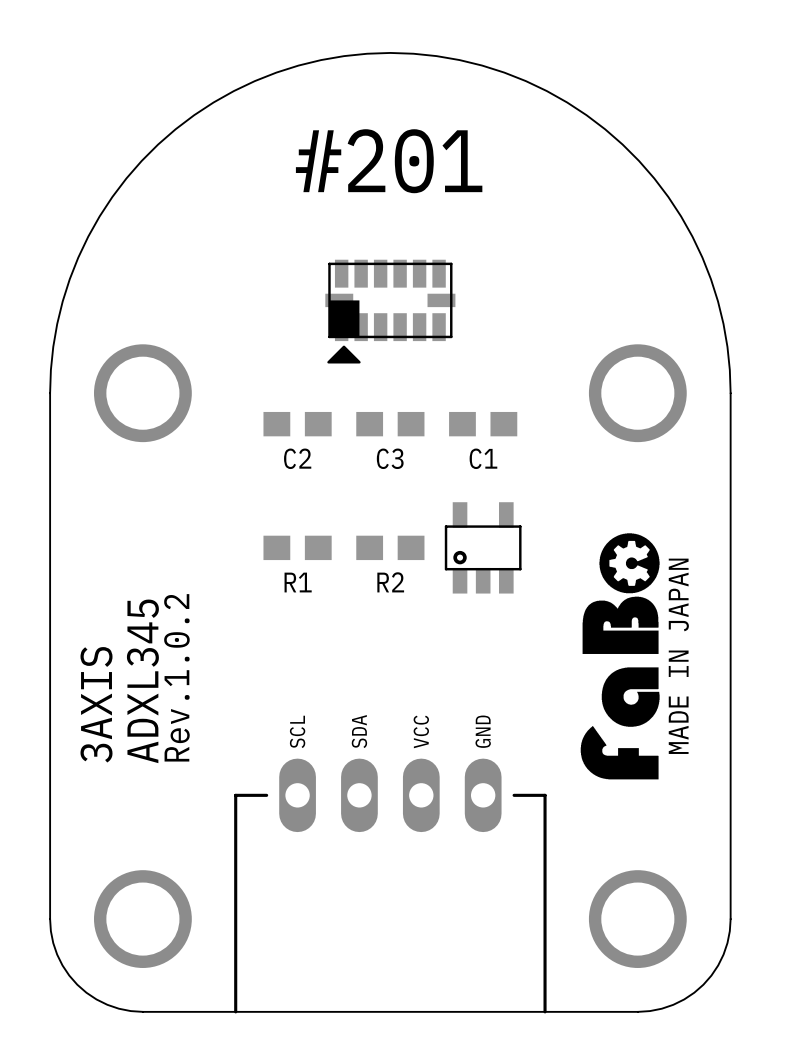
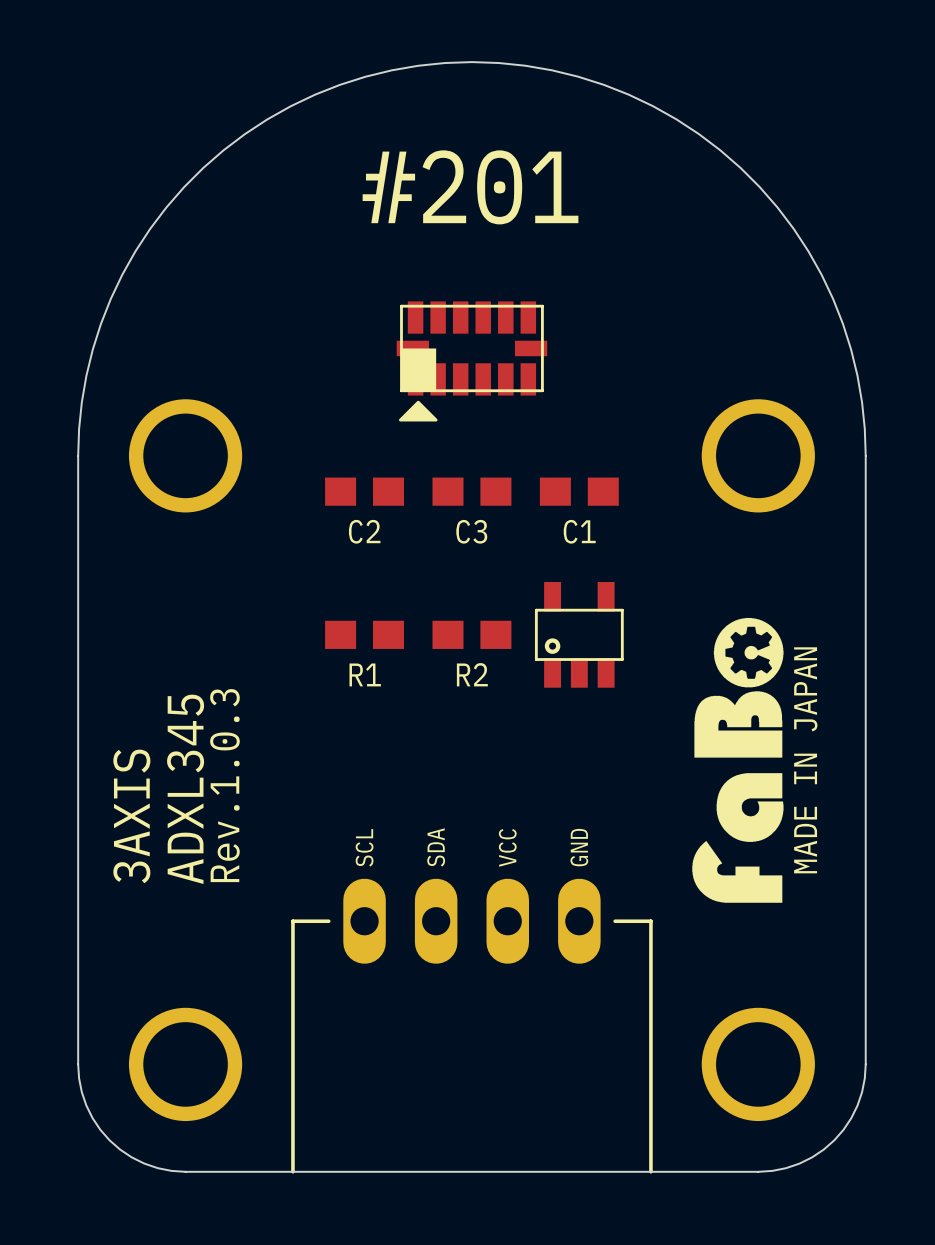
text: Rev.1.0.2 (176, 677) -> Rev.1.0.3 (224, 785)

